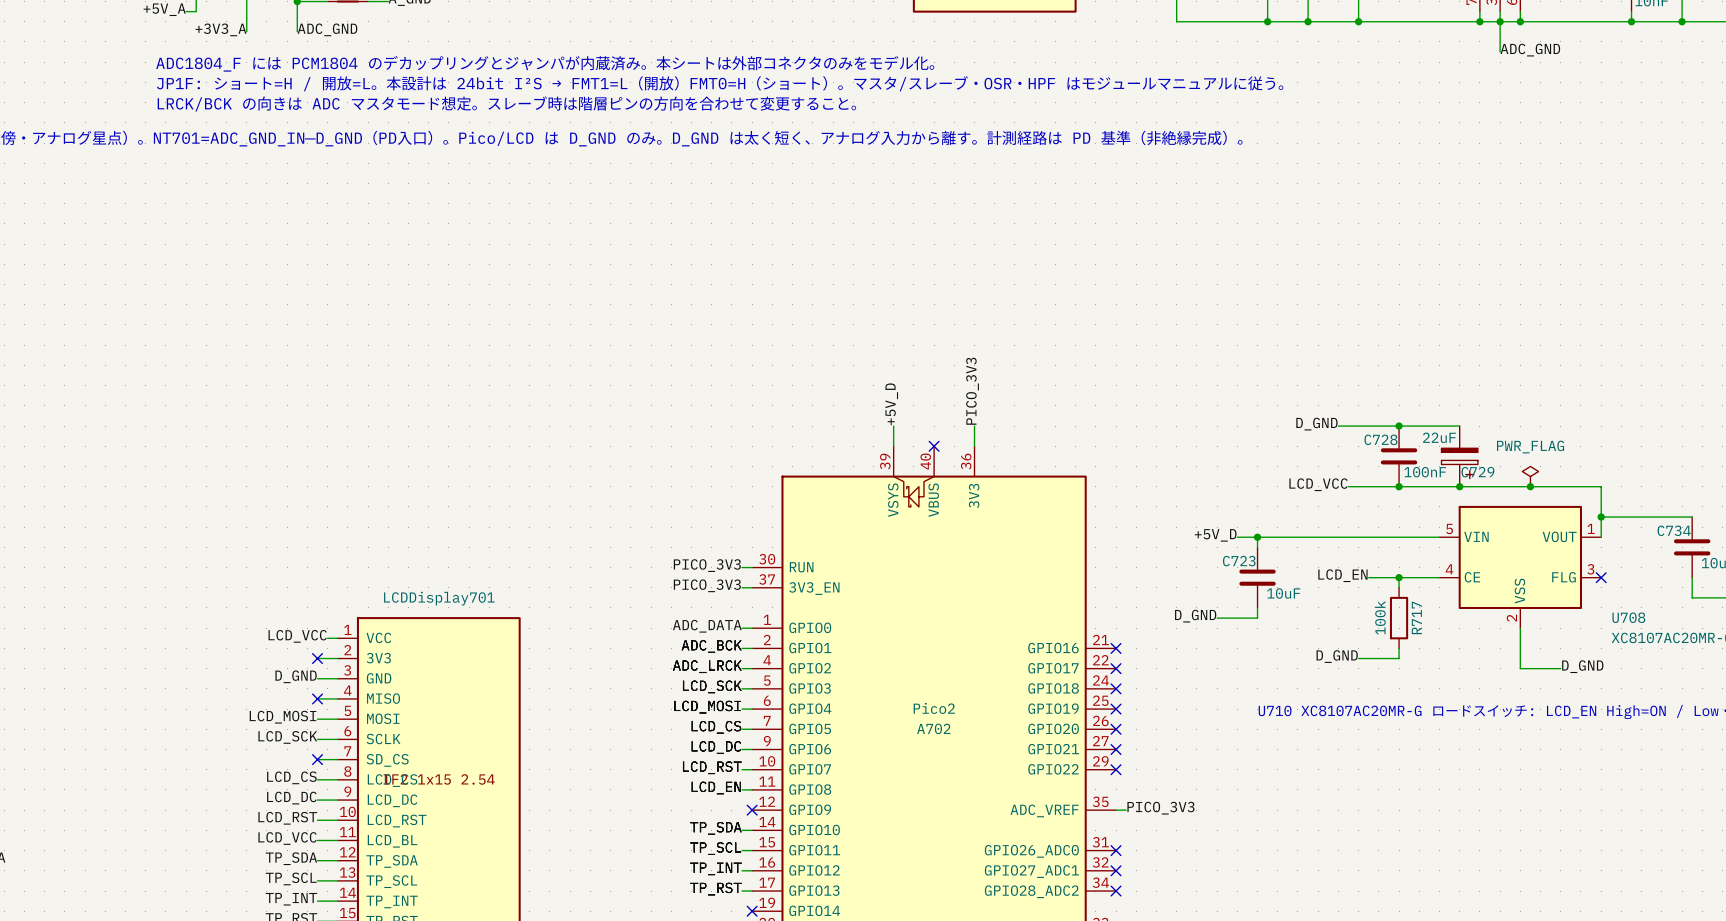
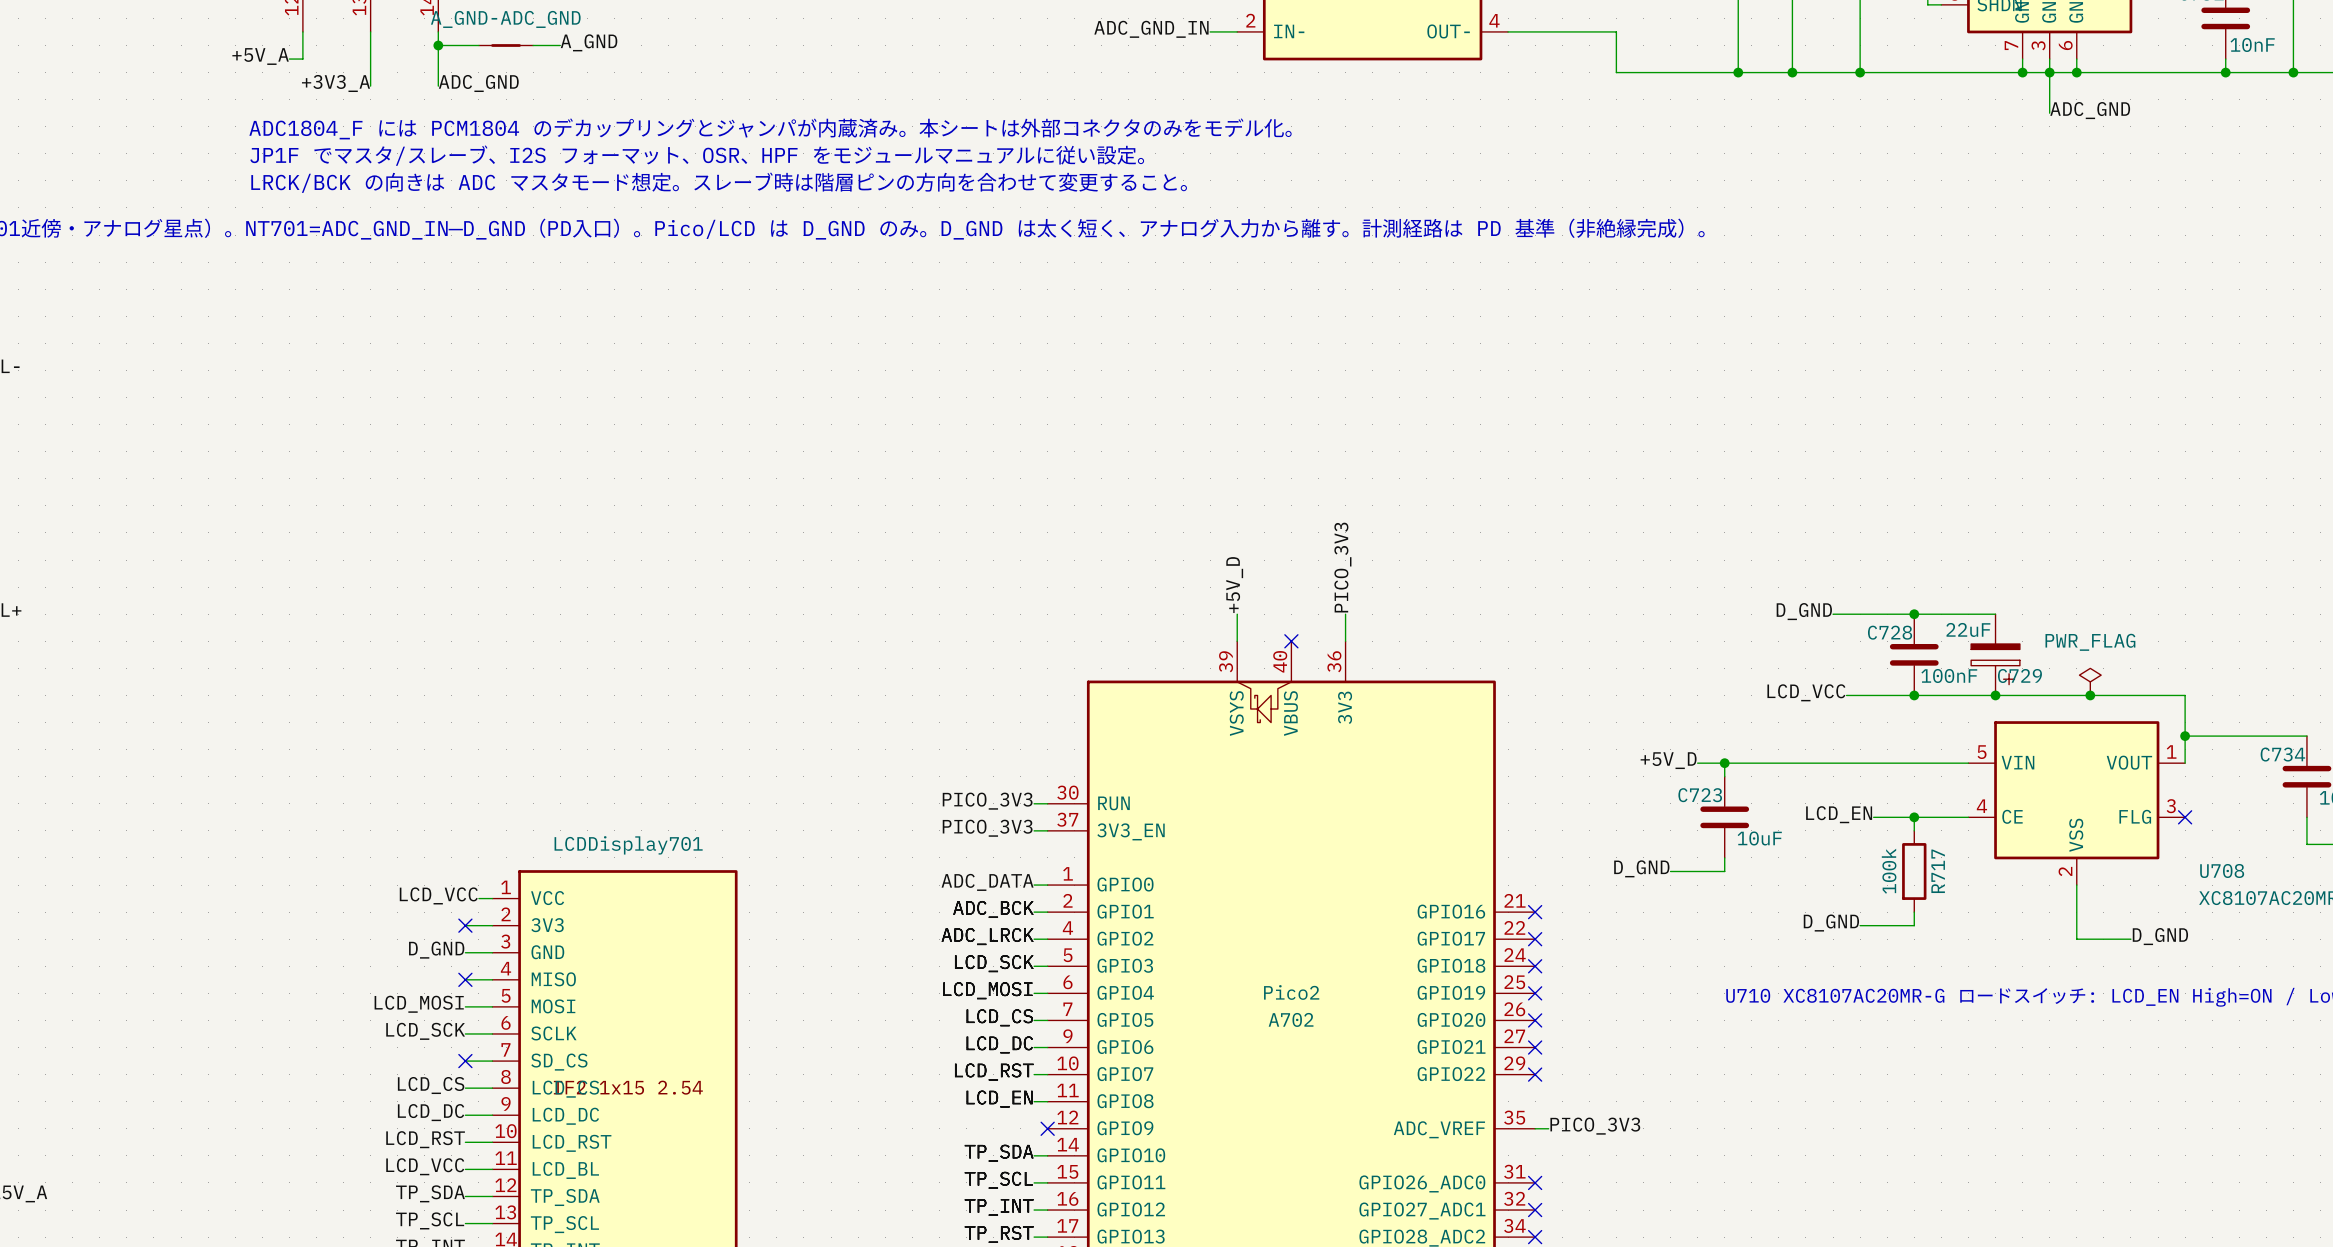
text: JP1F: ショート=H / 開放=L。本設計は 24bit I²S → FMT1=L（開放）FMT0=H（ショート）。マスタ/スレーブ・OSR・HPF はモジュールマニュアルに従う。 (720, 83) -> JP1F でマスタ/スレーブ、I2S フォーマット、OSR、HPF をモジュールマニュアルに従い設定。 (697, 155)

